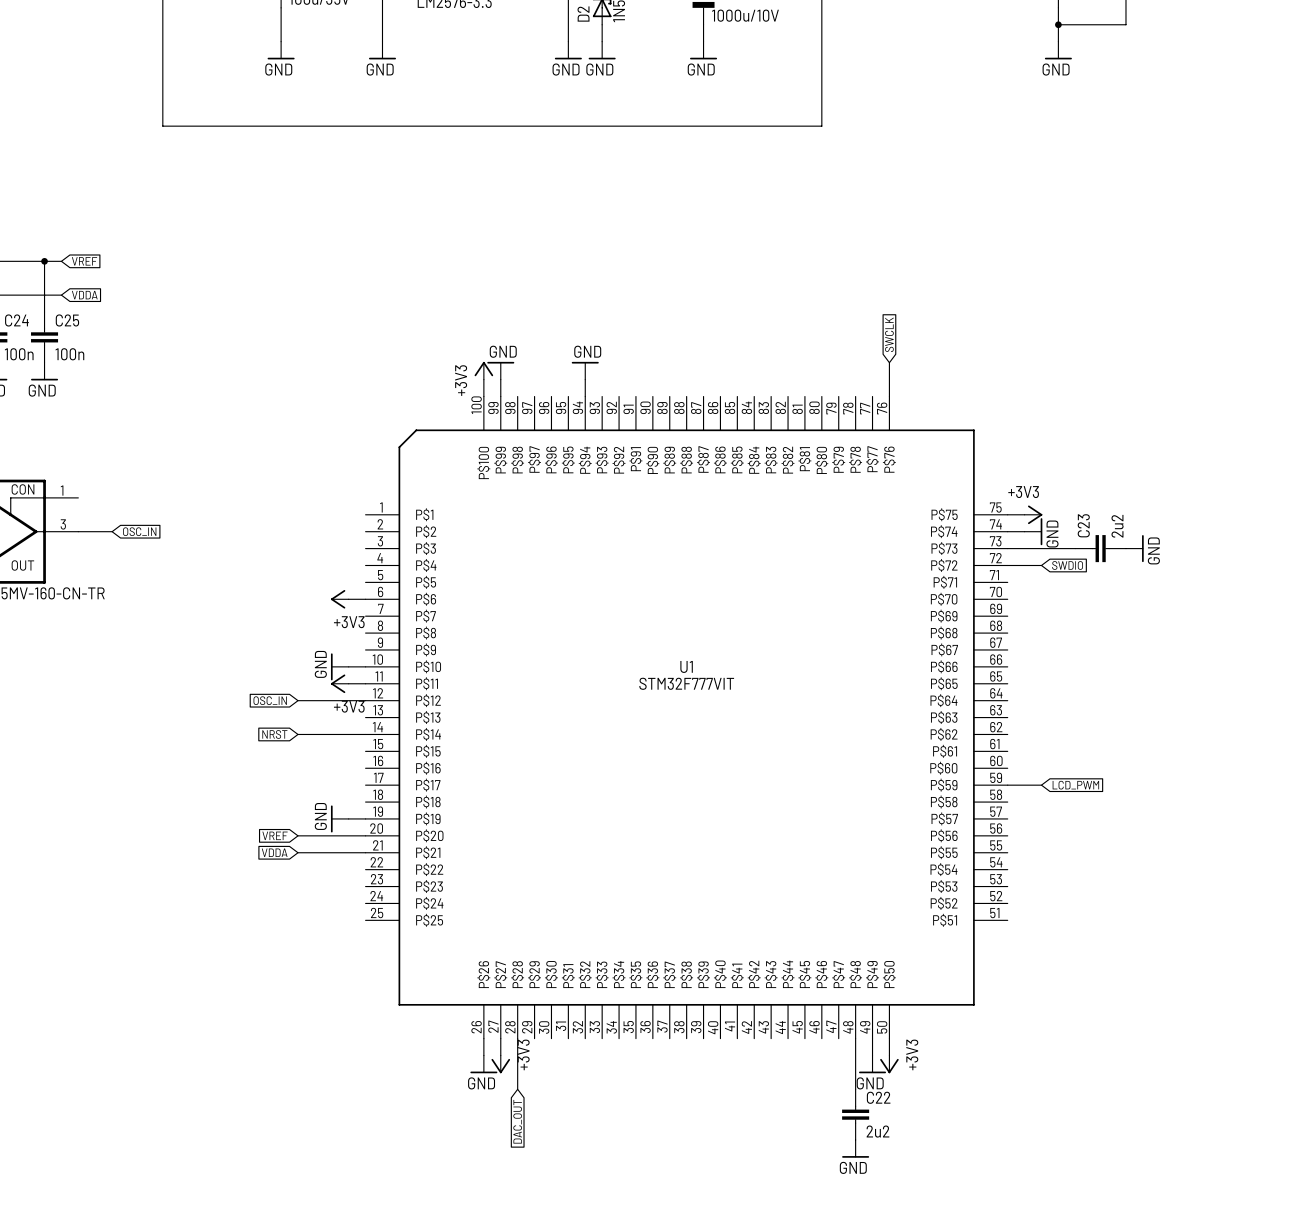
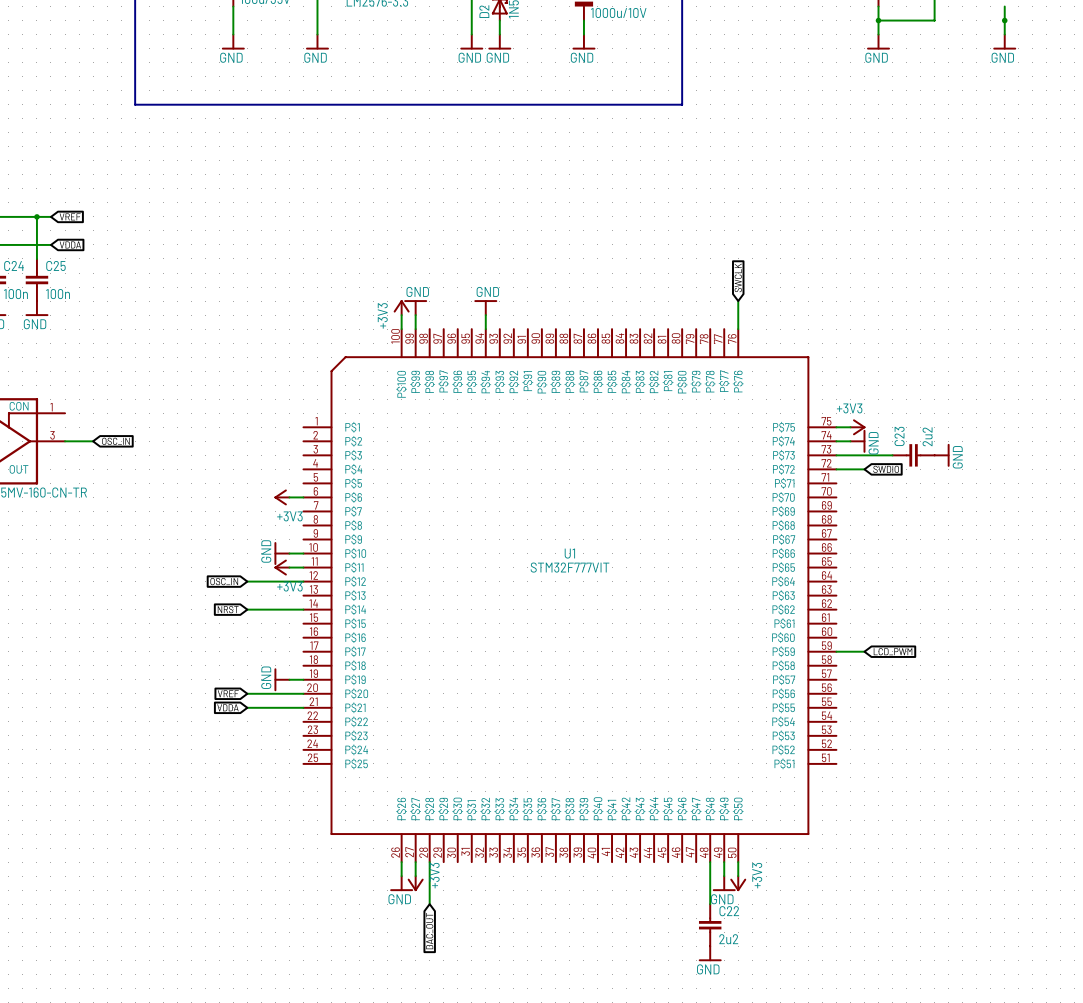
wire: none -> (1004, 6) (1004, 34)
junction: none -> (1004, 20)
power symbol: none -> GND (1004, 41)

